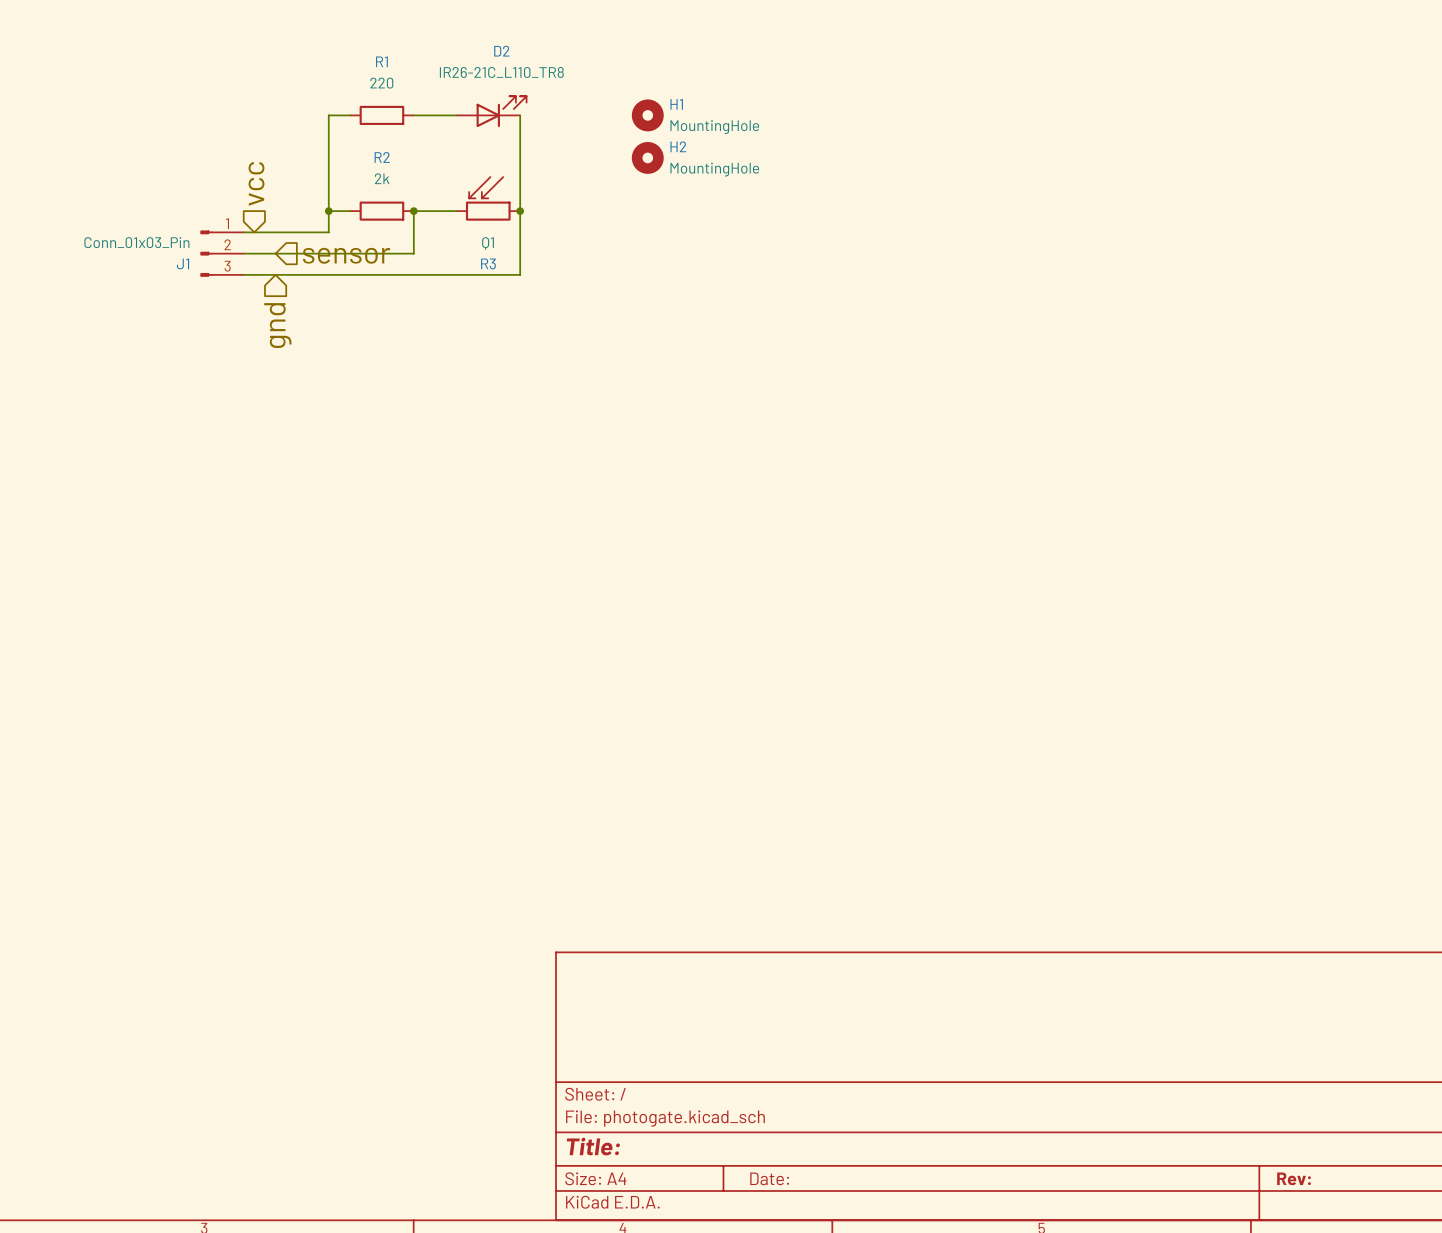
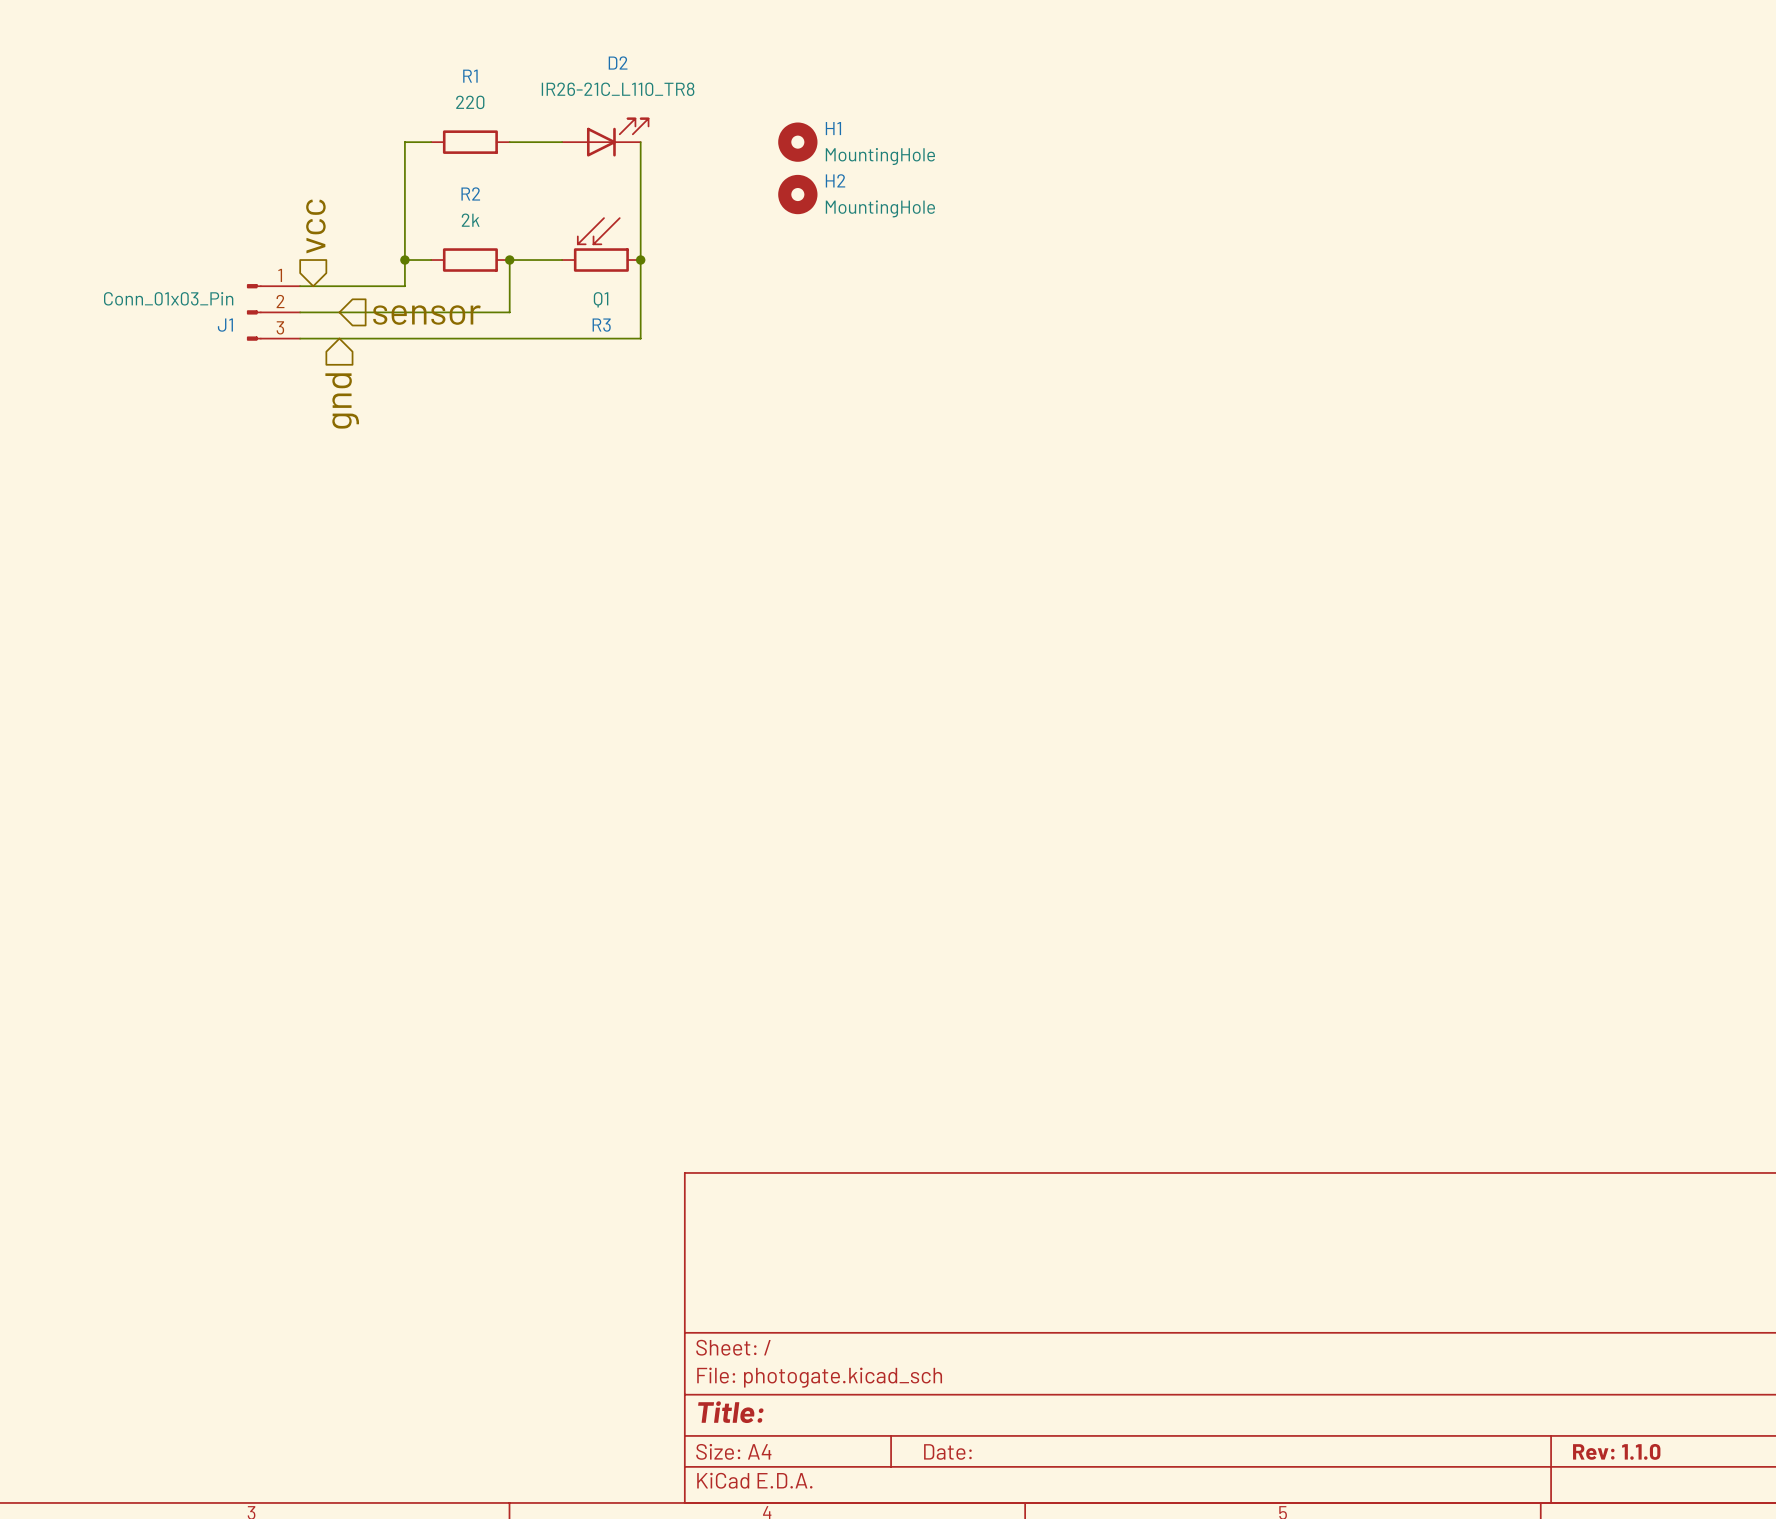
title block: Rev: (1294, 1178) -> Rev: 1.1.0 (1616, 1451)

